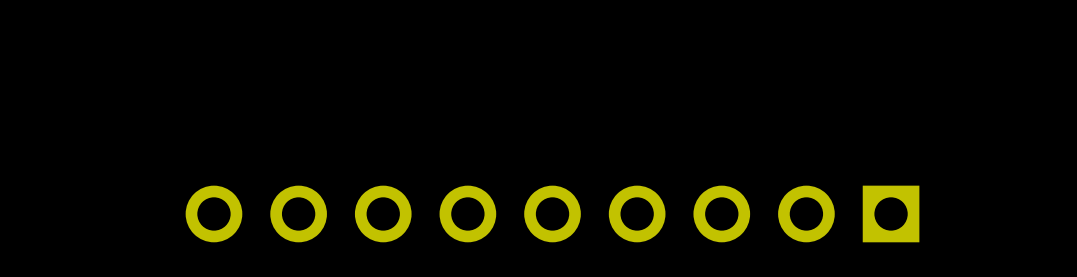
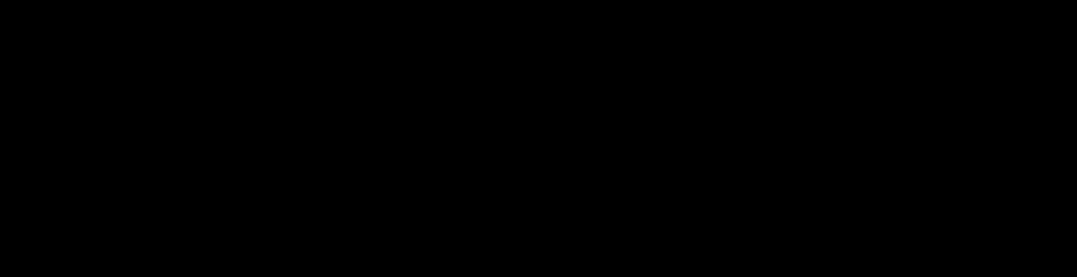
part: (552, 213) -> none

